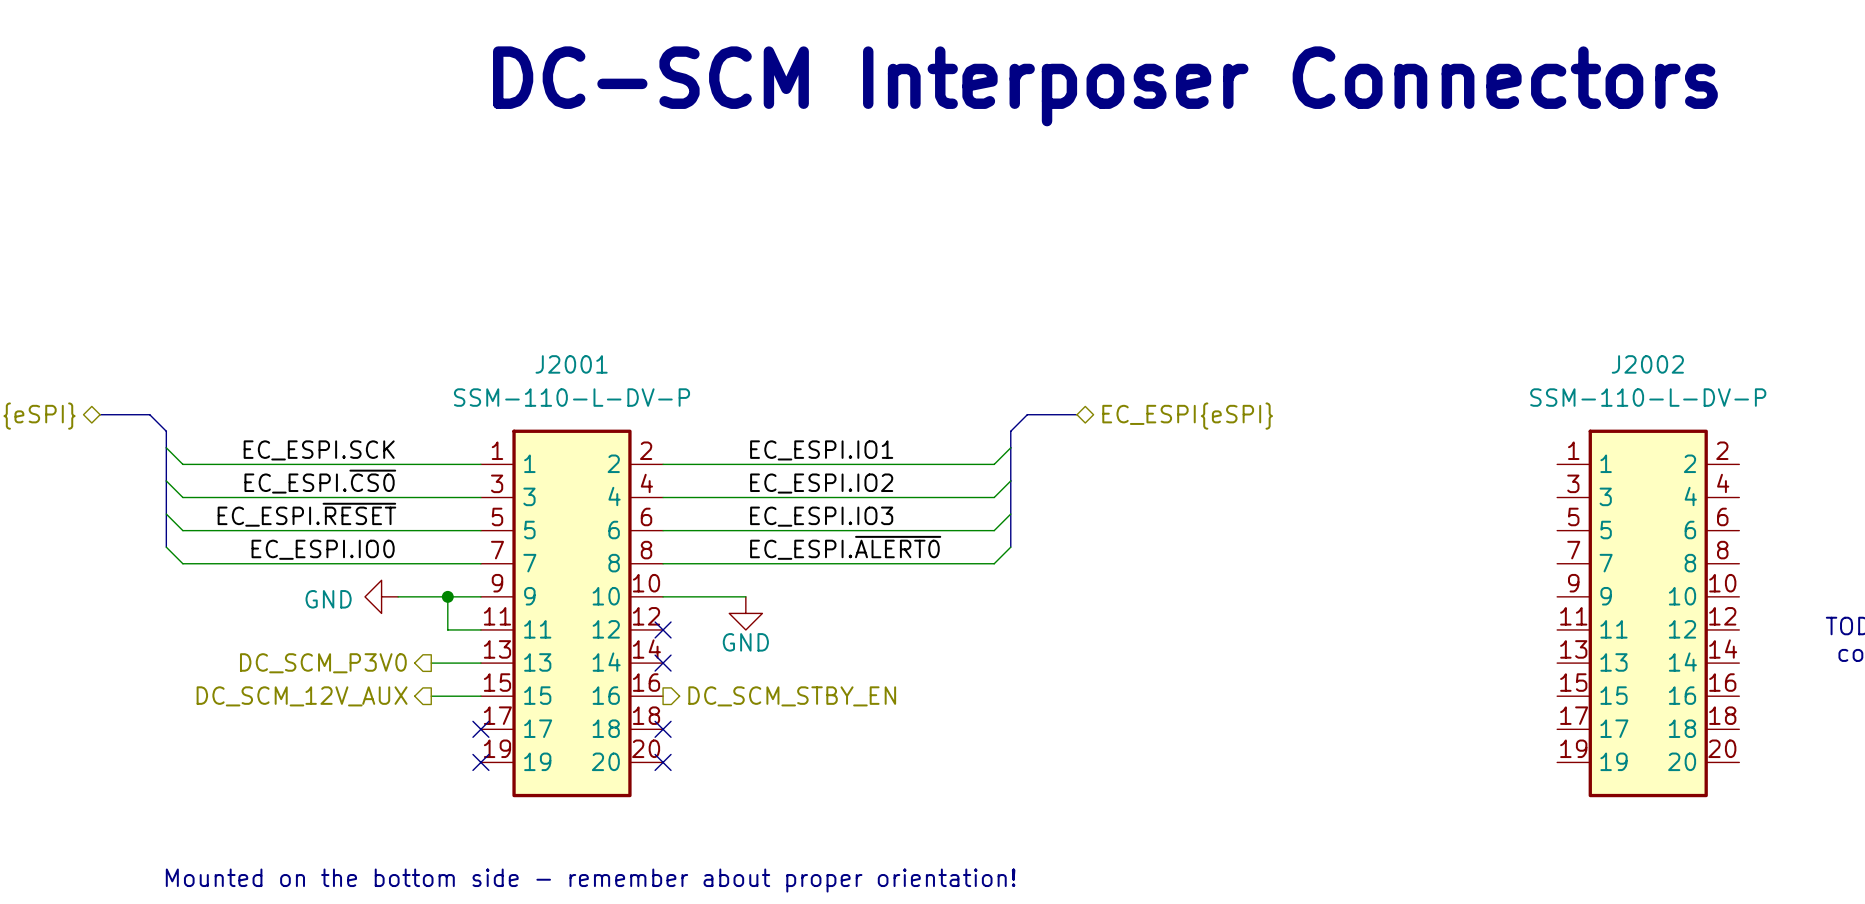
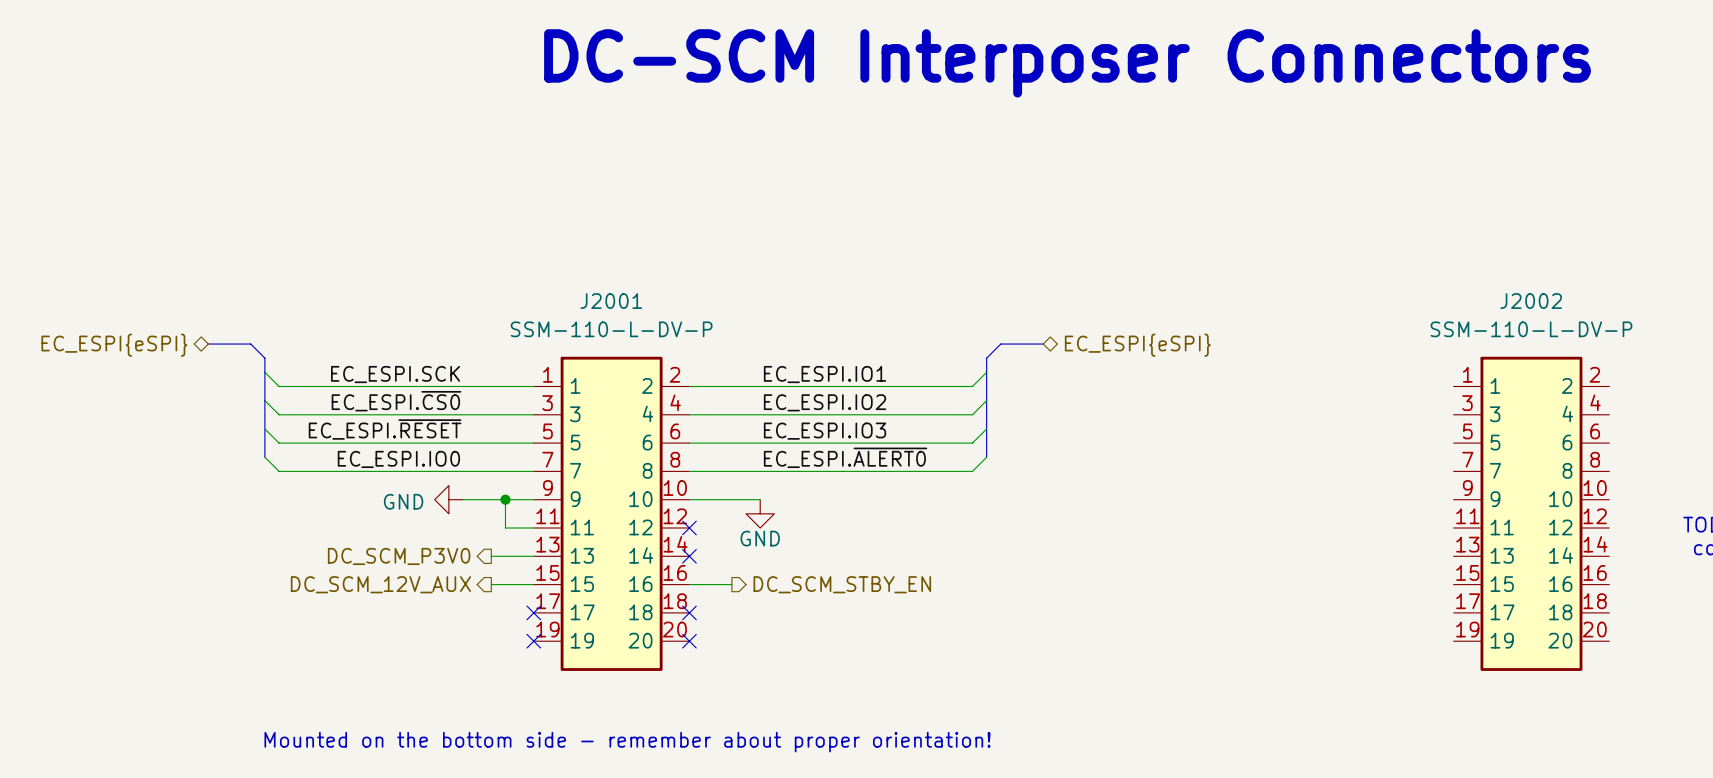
wire: none -> (689, 584) (731, 584)
hierarchical label position: DC_SCM_STBY_EN (792, 696) -> DC_SCM_STBY_EN (842, 584)

